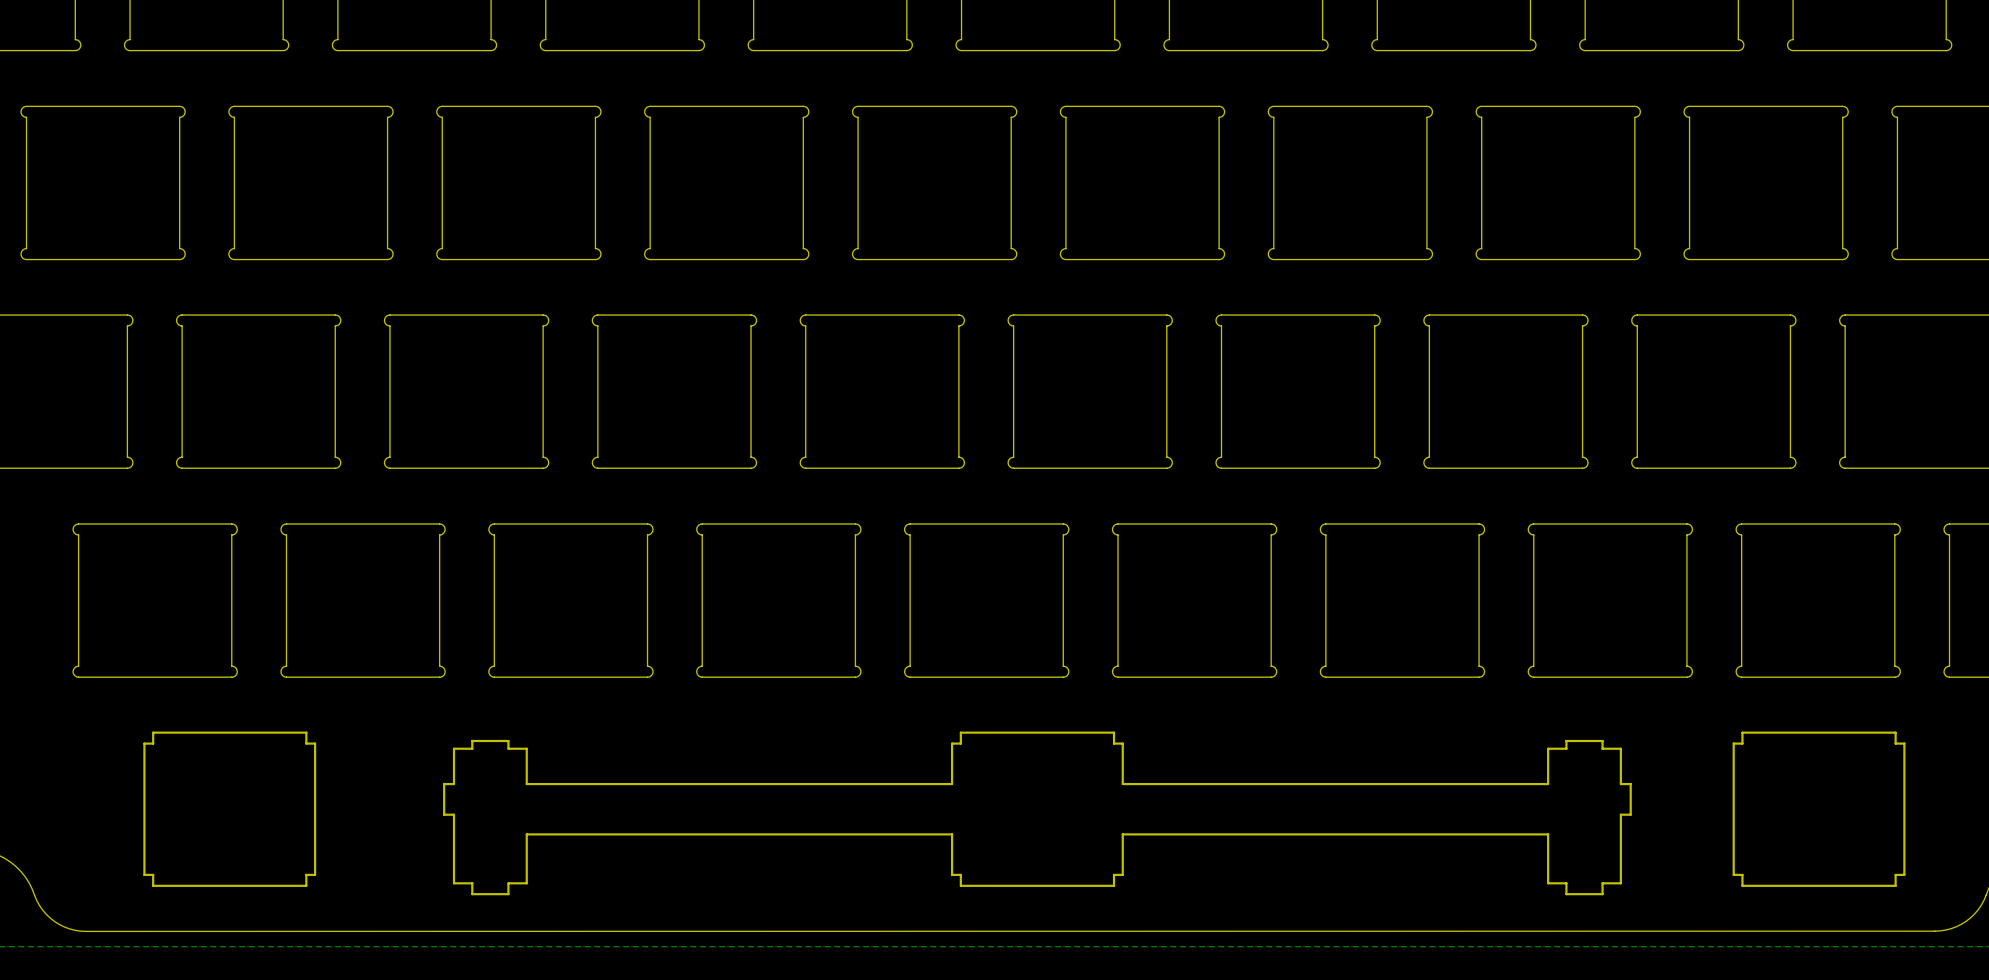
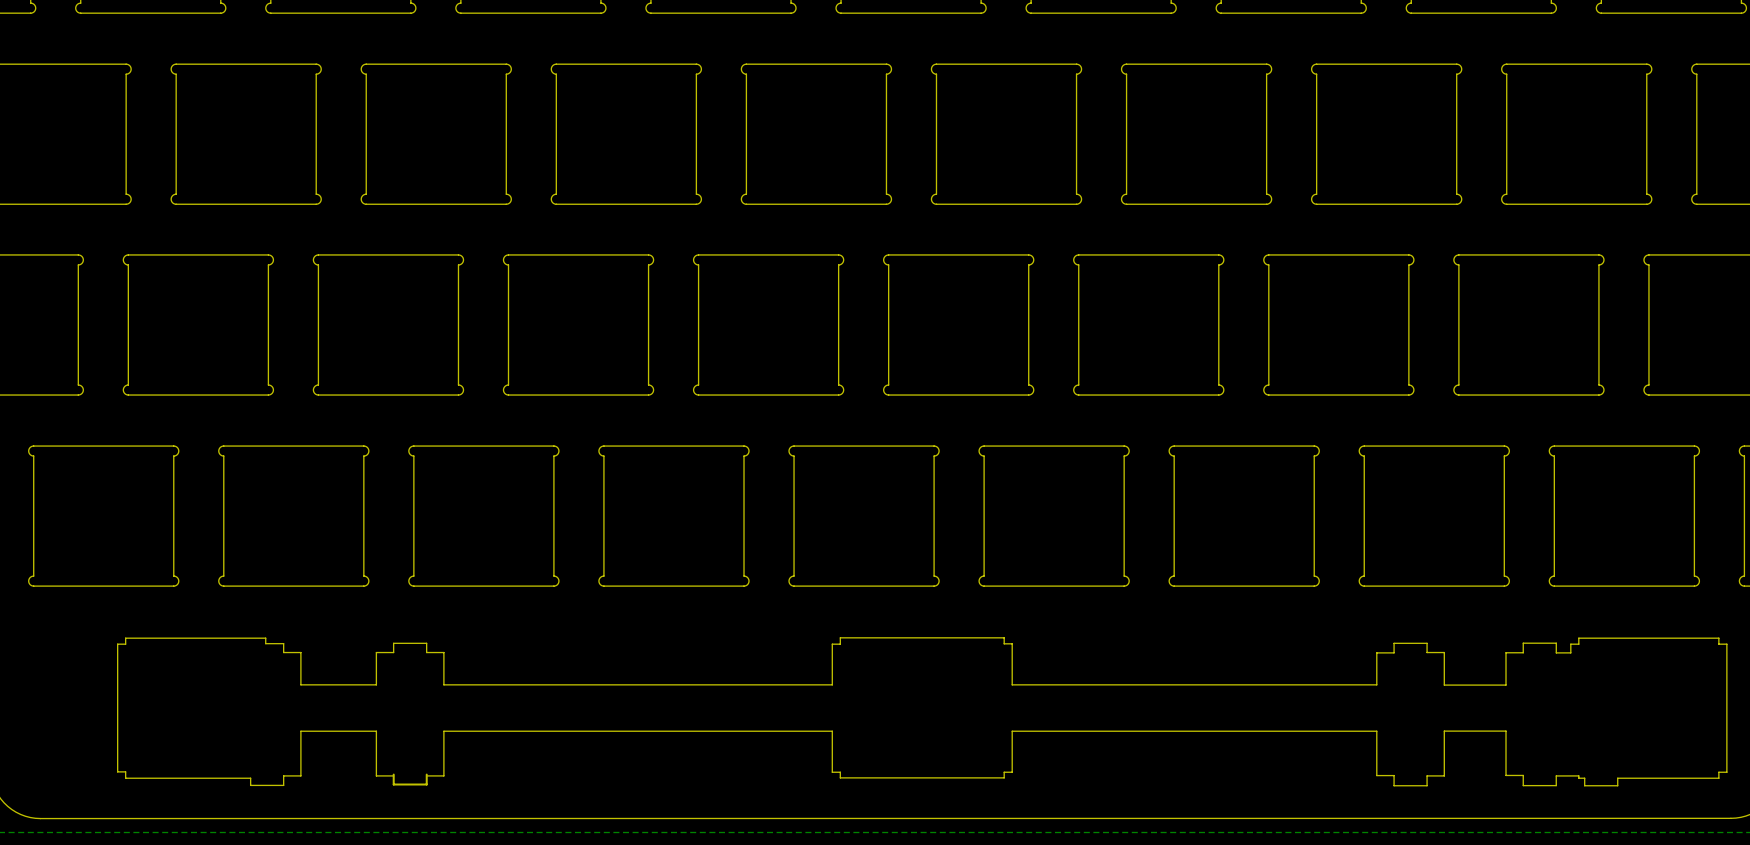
board edge: (306, 732) (153, 732) (153, 743) (144, 743) (144, 874) (153, 874) (153, 885) (306, 885) (306, 874) (315, 874) (315, 743) (306, 743) (306, 732) -> none
board edge: (1895, 732) (1895, 743) (1904, 743) (1904, 874) (1895, 874) (1895, 885) (1742, 885) (1742, 874) (1733, 874) (1733, 743) (1742, 743) (1742, 732) (1895, 732) -> none
board edge: none -> (1556, 643) (1556, 652) (1570, 652) (1570, 644) (1578, 644) (1578, 638) (1718, 638) (1718, 644) (1726, 644) (1726, 772) (1718, 772) (1718, 778) (1617, 778) (1617, 785) (1584, 785) (1584, 778) (1578, 778) (1578, 775) (1556, 775) (1556, 785) (1523, 785) (1523, 775) (1506, 775) (1506, 731) (1444, 731) (1444, 775) (1427, 775) (1427, 785) (1394, 785) (1394, 775) (1376, 775) (1376, 731) (1012, 731) (1012, 772) (1004, 772) (1004, 777) (840, 777) (840, 772) (832, 772) (832, 731) (443, 731) (443, 775) (426, 775)
board edge: none -> (1556, 643) (1523, 643) (1523, 652) (1506, 652) (1506, 685) (1444, 685) (1444, 652) (1427, 652) (1427, 643) (1394, 643) (1394, 652)
board edge: none -> (1394, 652) (1376, 652) (1376, 684) (1012, 684) (1012, 643) (1004, 643) (1004, 637) (840, 637) (840, 644) (832, 644) (832, 684) (443, 684) (443, 652) (426, 652) (426, 643) (393, 643) (393, 652) (376, 652) (376, 684) (300, 684) (300, 652) (283, 652) (283, 643) (265, 643) (265, 638) (125, 638) (125, 644) (117, 644) (117, 771) (125, 771) (125, 778) (250, 778) (250, 785) (283, 785) (283, 775) (300, 775) (300, 731) (376, 731) (376, 775) (393, 775)
board edge: (508, 883) (526, 883) (526, 834) (952, 834) (952, 874) (960, 874) (960, 885) (1114, 885) (1114, 874) (1122, 874) (1122, 834) (1548, 834) (1548, 883) (1566, 883) (1566, 894) (1602, 894) (1602, 883) (1620, 883) (1620, 814) (1630, 814) (1630, 784) (1620, 784) (1620, 748) (1602, 748) (1602, 740) (1566, 740) (1566, 748) (1548, 748) (1548, 784) (1122, 784) (1122, 743) (1114, 743) (1114, 732) (960, 732) (960, 743) (952, 743) (952, 784) (526, 784) (526, 748) (508, 748) (508, 740) (472, 740) (472, 748) (453, 748) (453, 784) (444, 784) (444, 814) (453, 814) (453, 883) (472, 883) -> none

